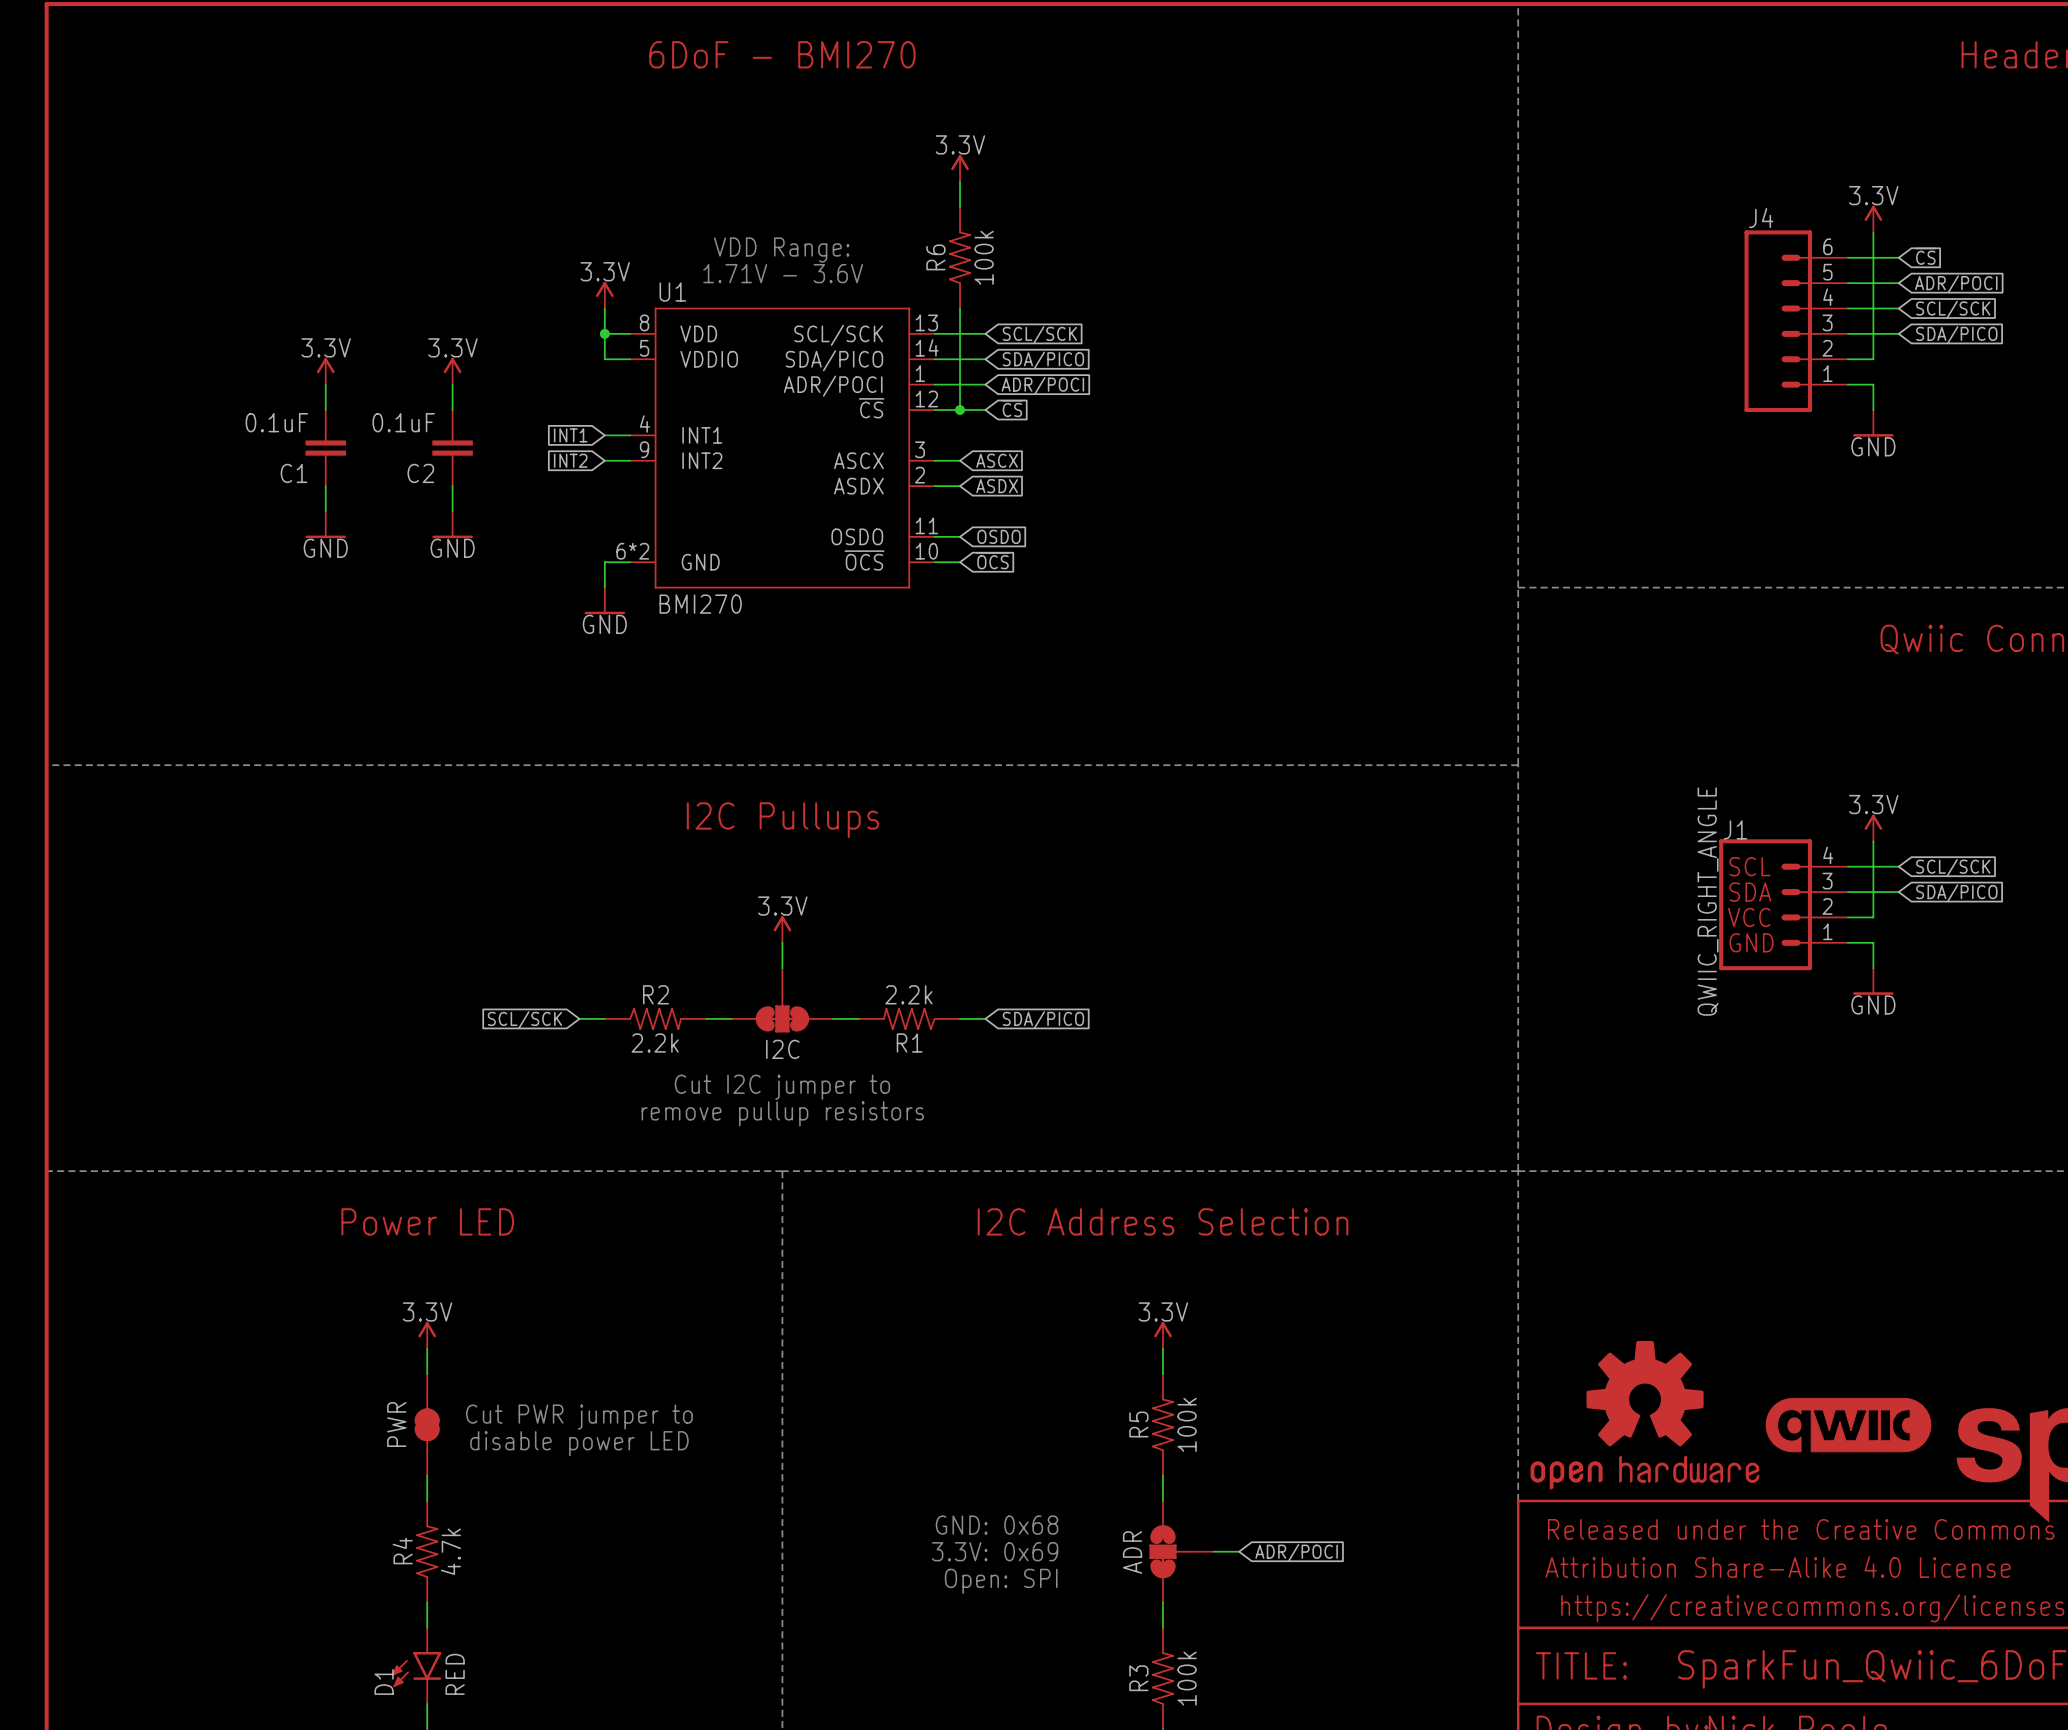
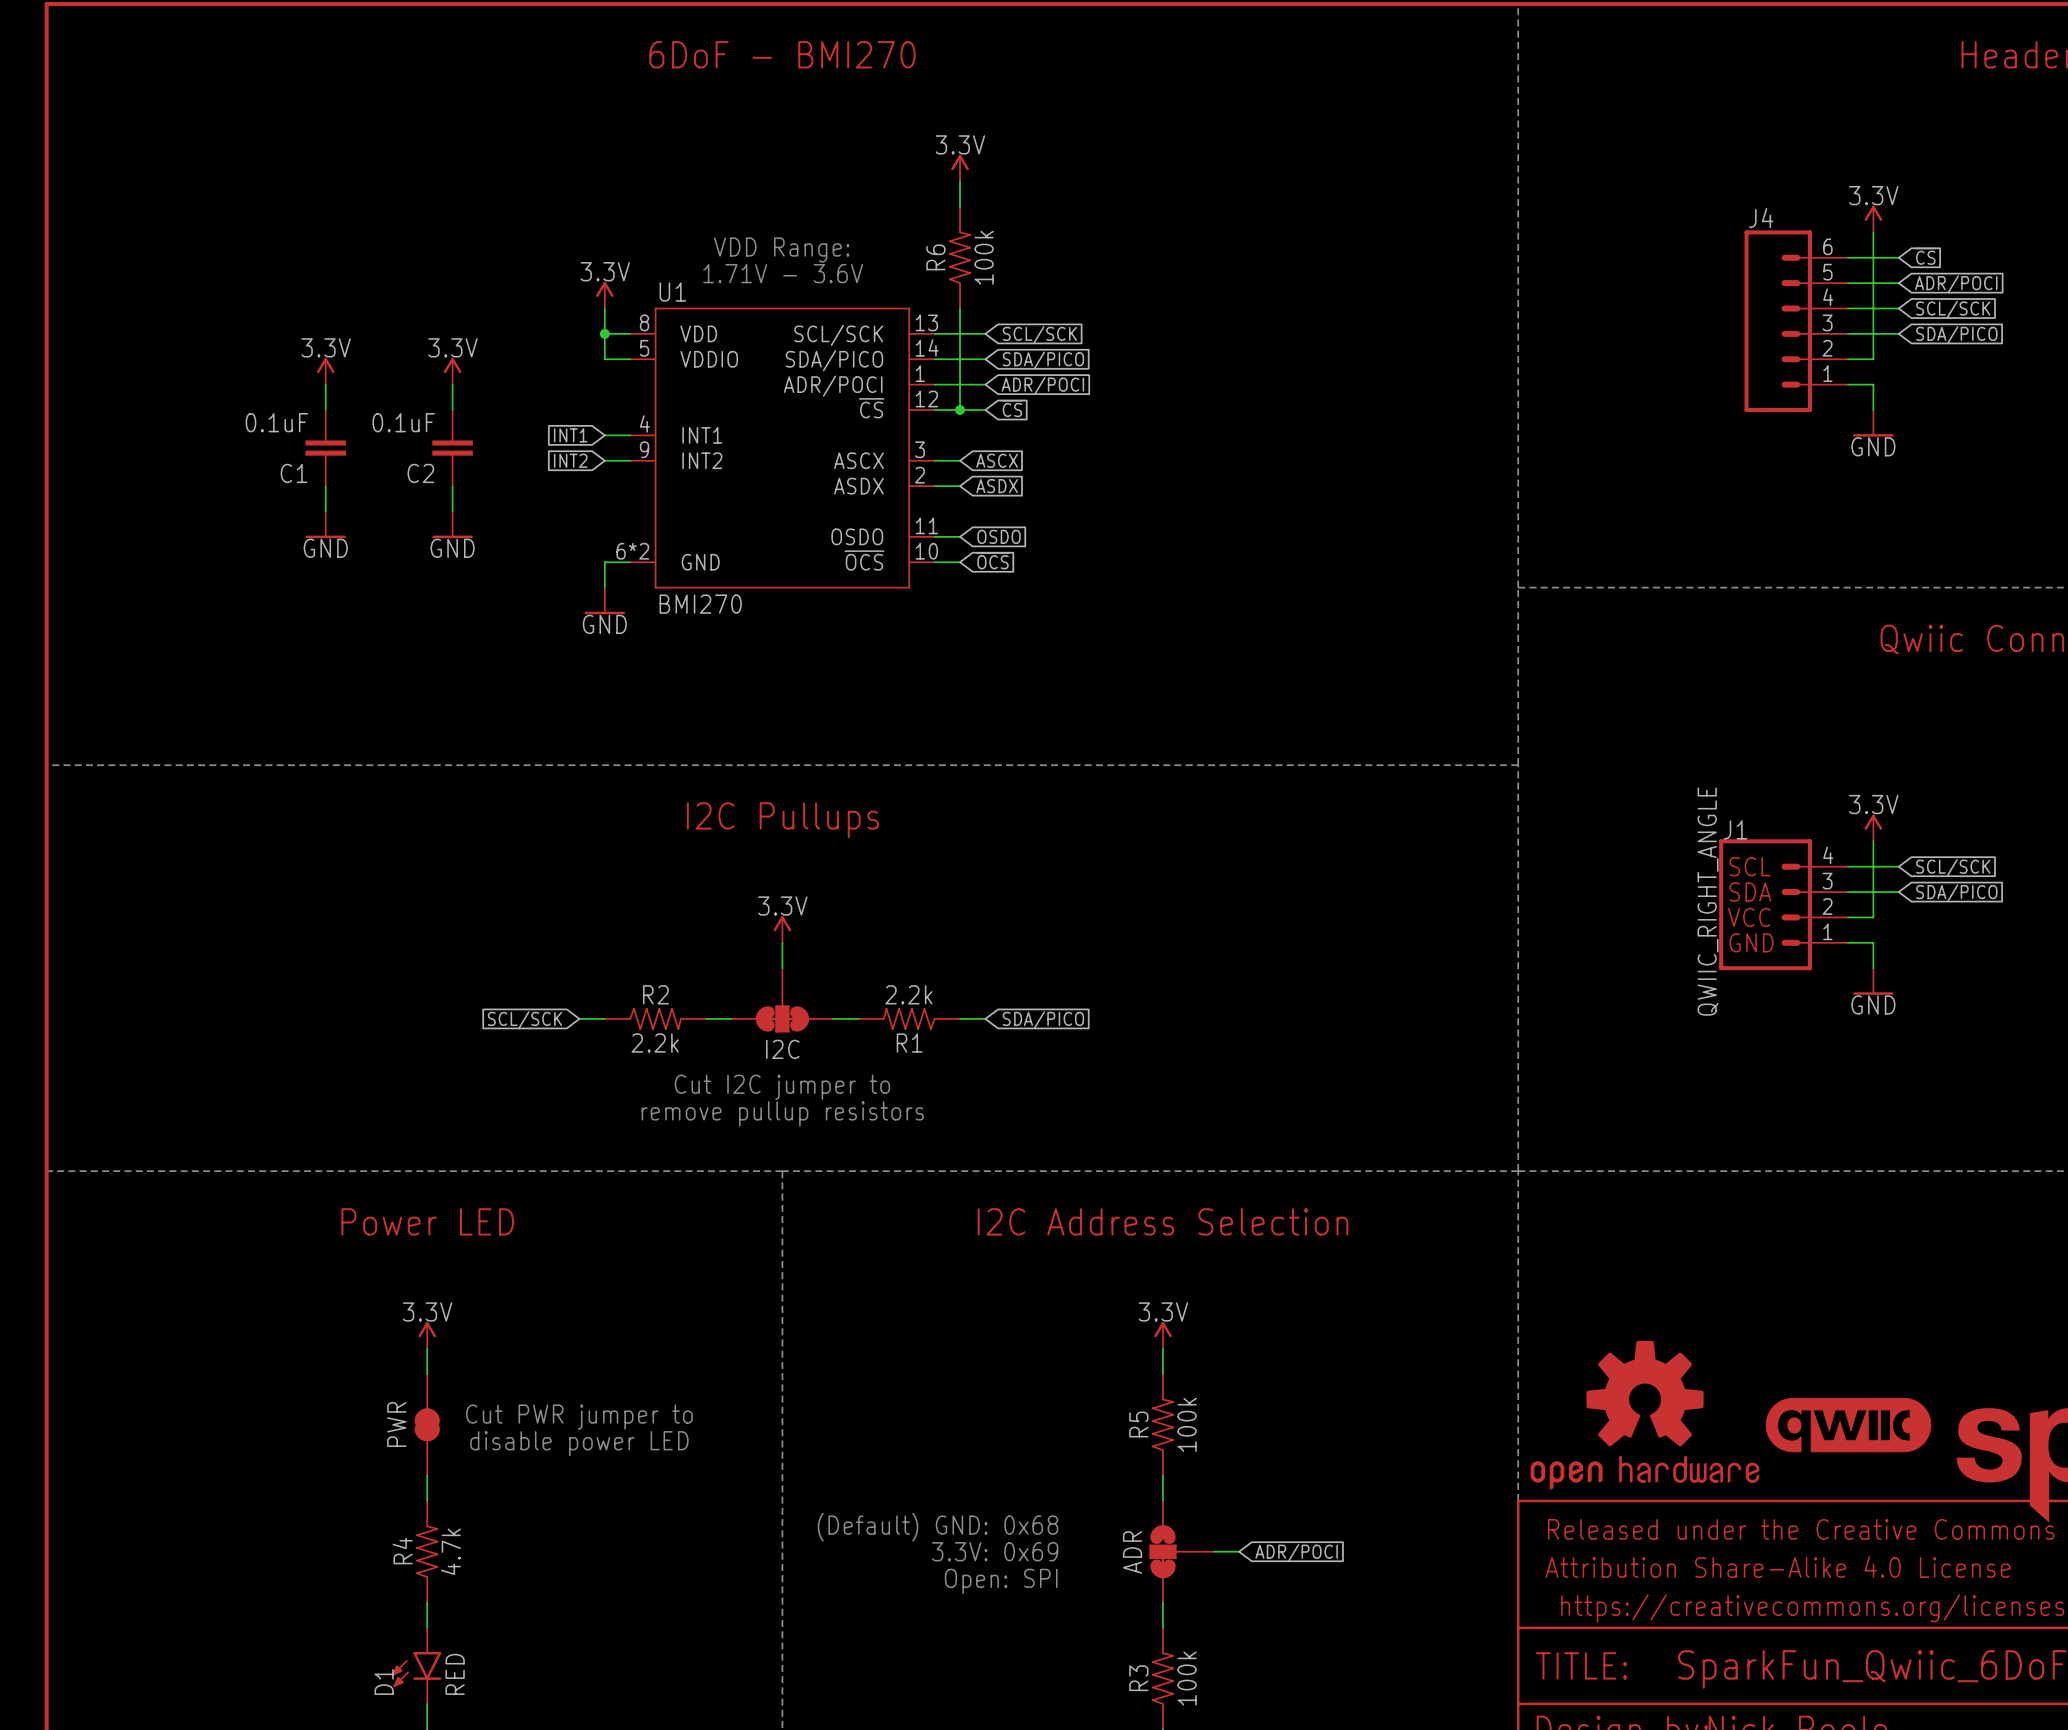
text: GND: 0x68 (997, 1525) -> (Default) GND: 0x68 (938, 1527)

